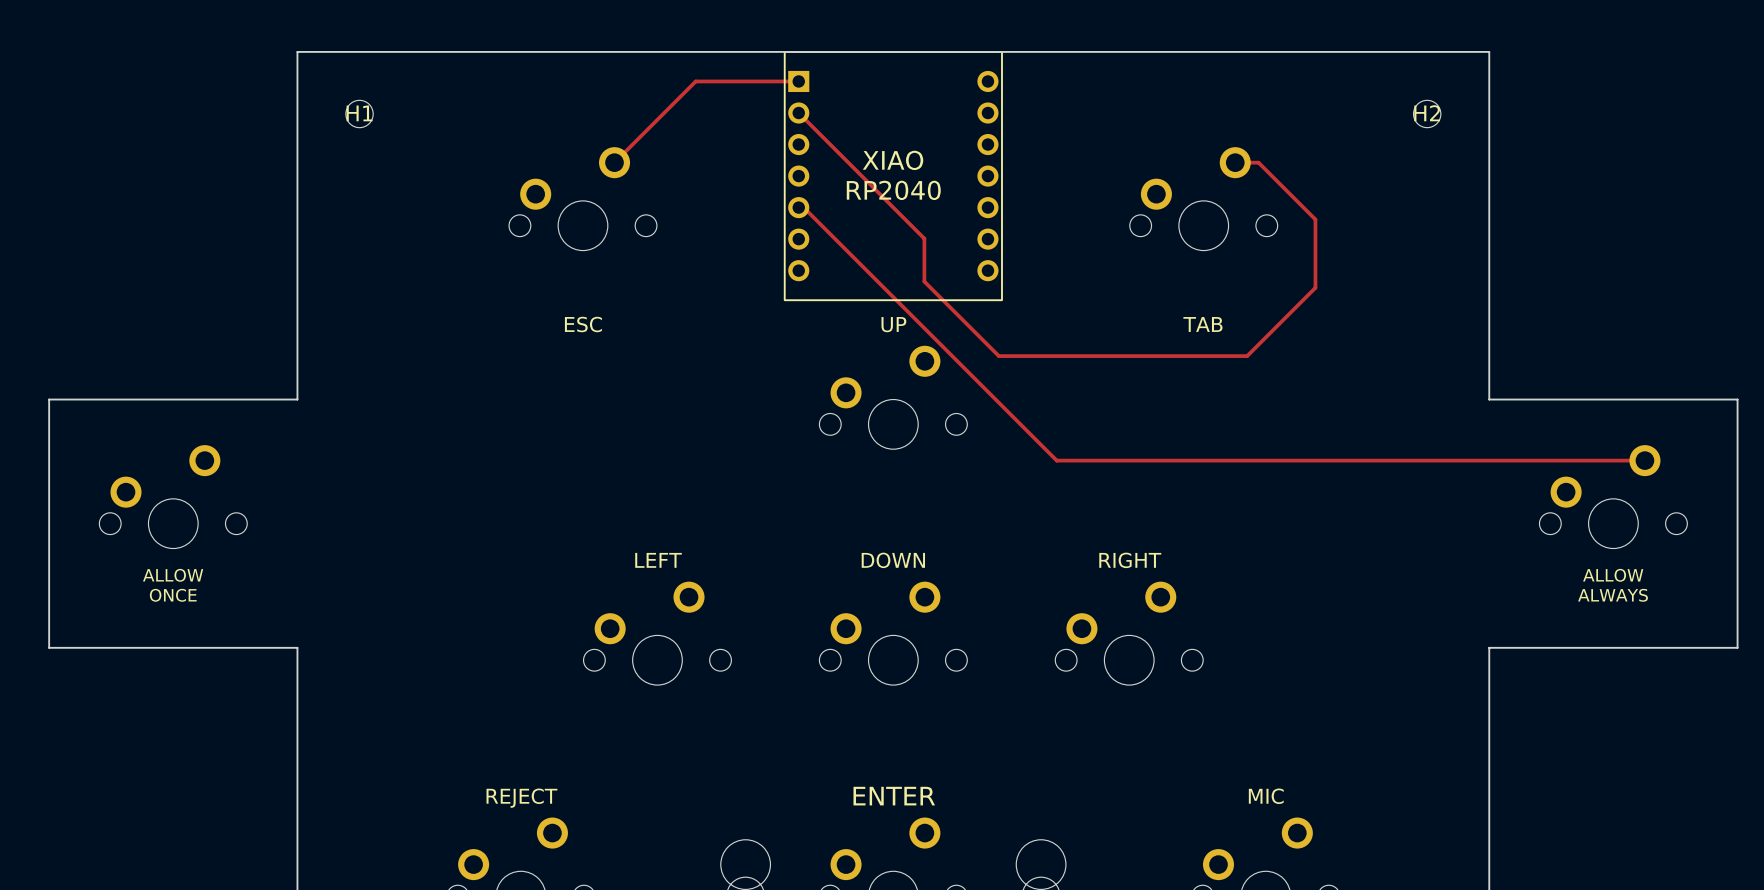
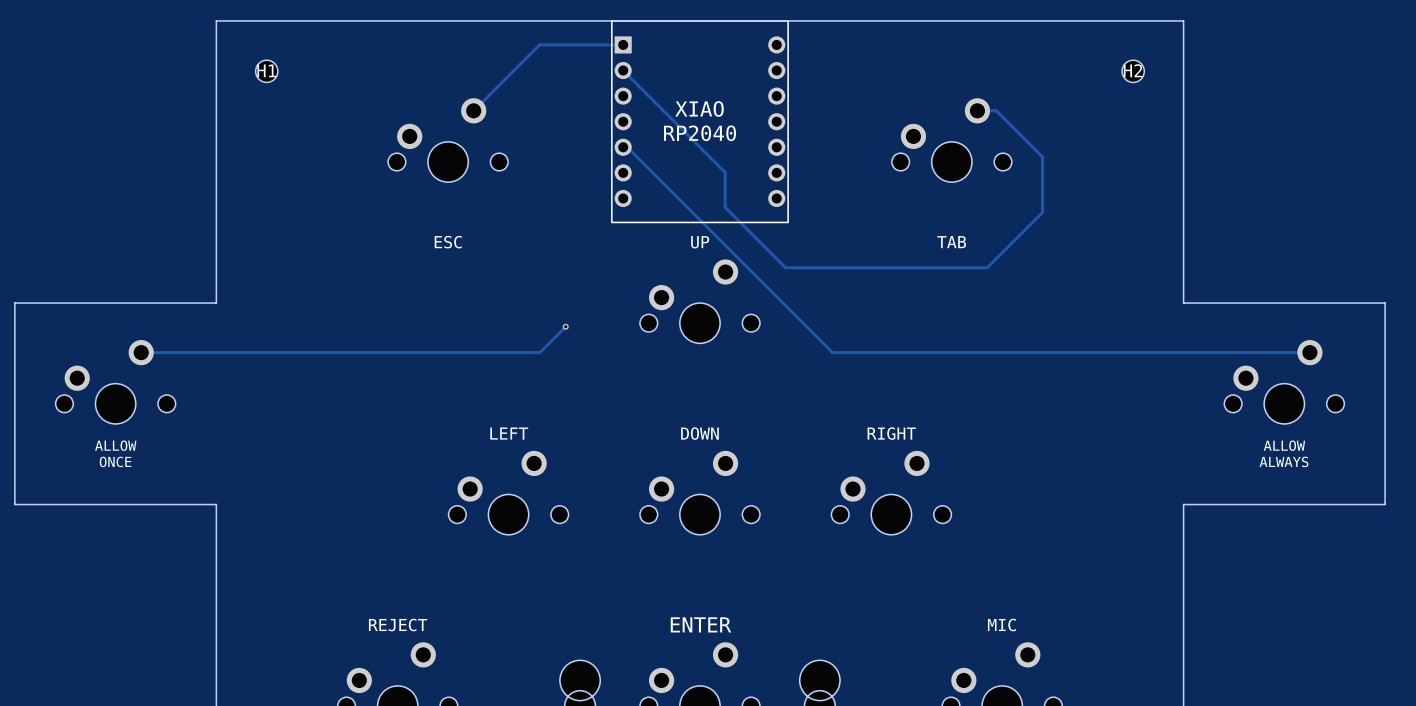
track: none -> (565, 326) (539, 352) (141, 352)
via: none -> (565, 326)

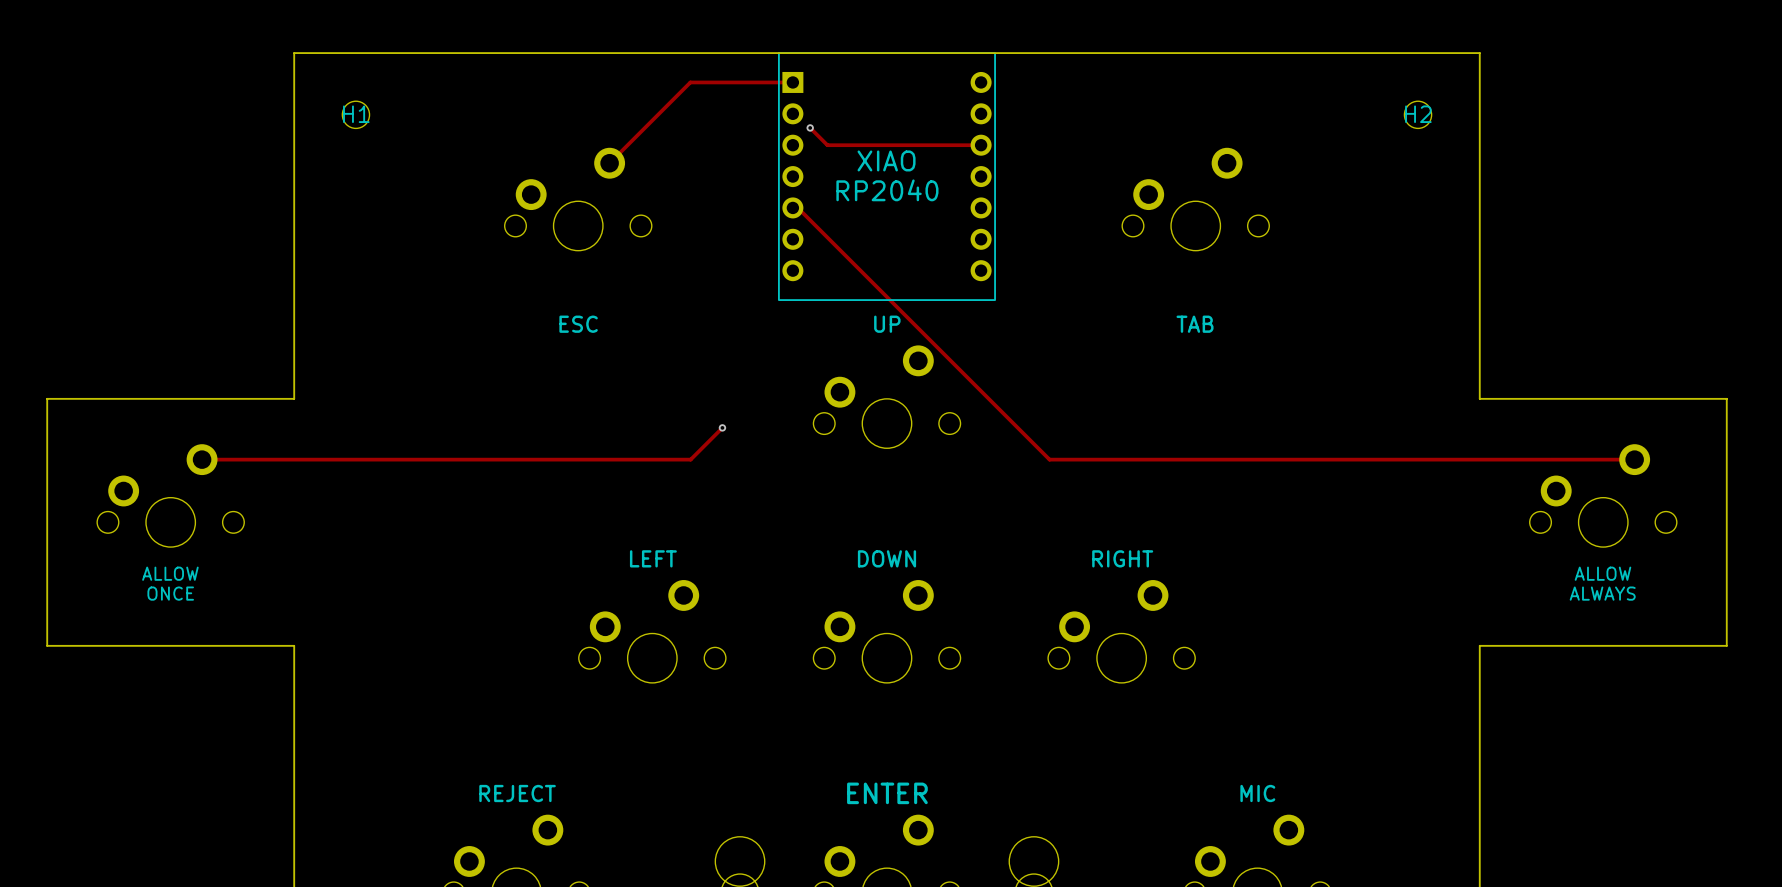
track: (623, 70) (725, 172) (725, 207) (785, 267) (987, 267) (1042, 212) (1042, 156) (996, 110) (977, 110) -> none
track: none -> (810, 127) (827, 145) (981, 145)
via: none -> (810, 127)

